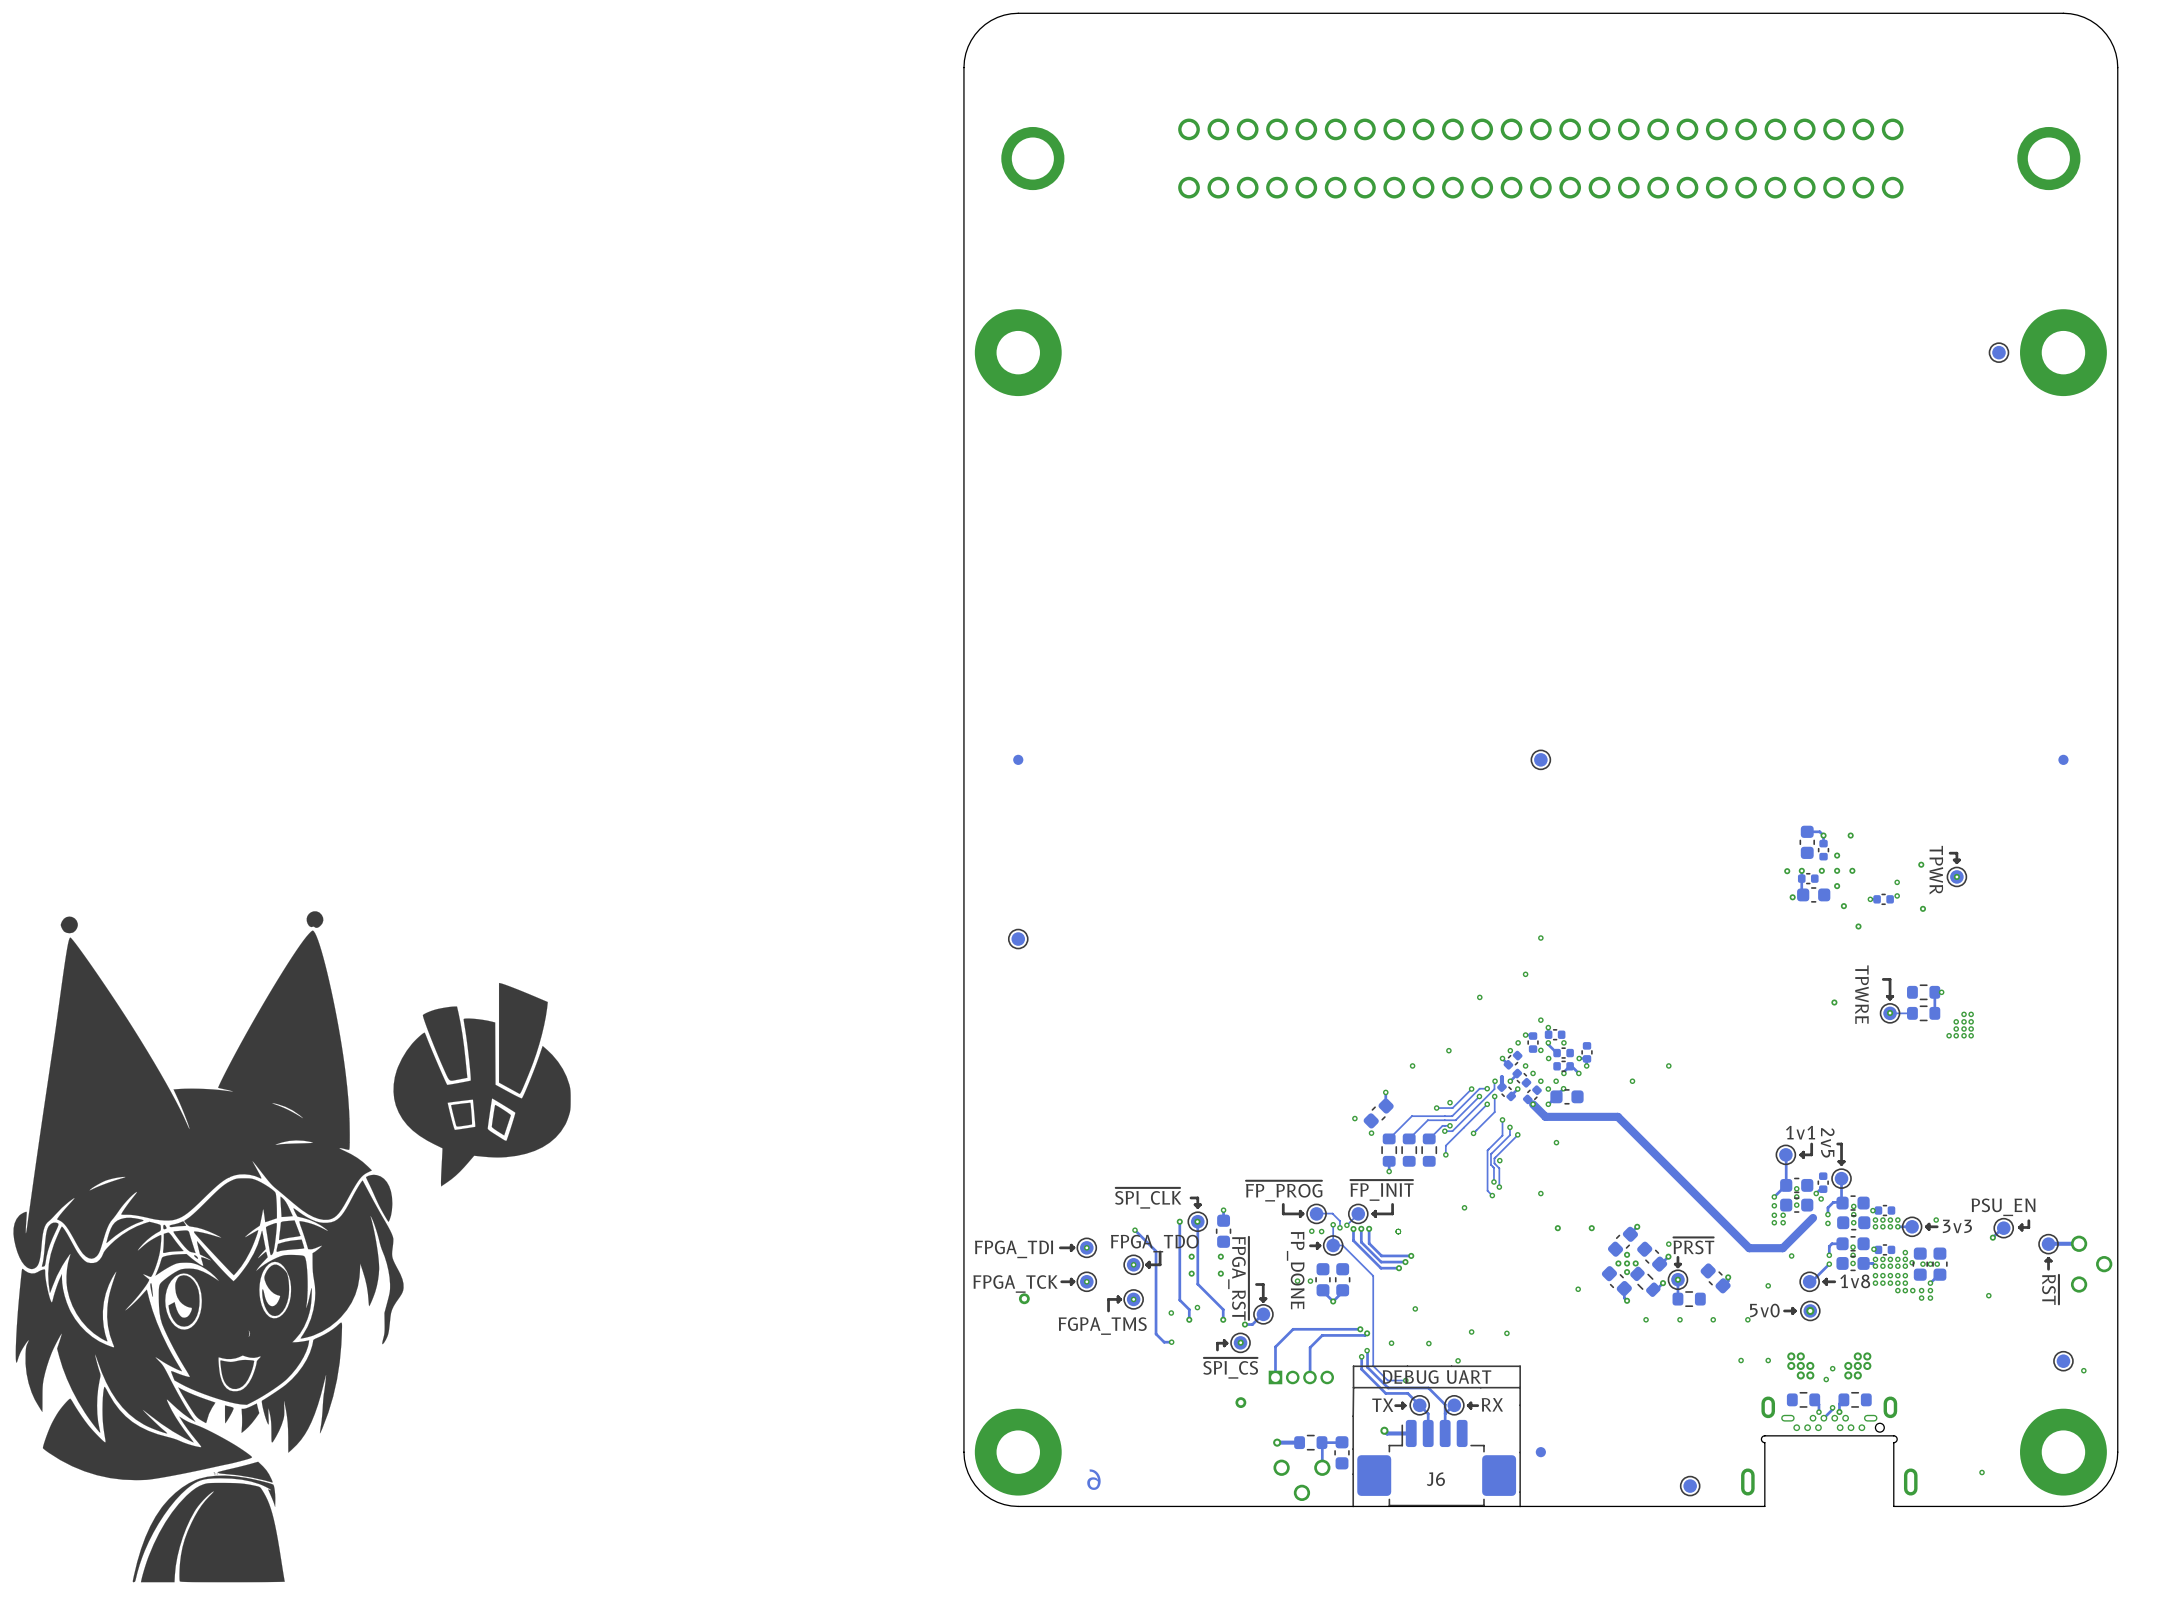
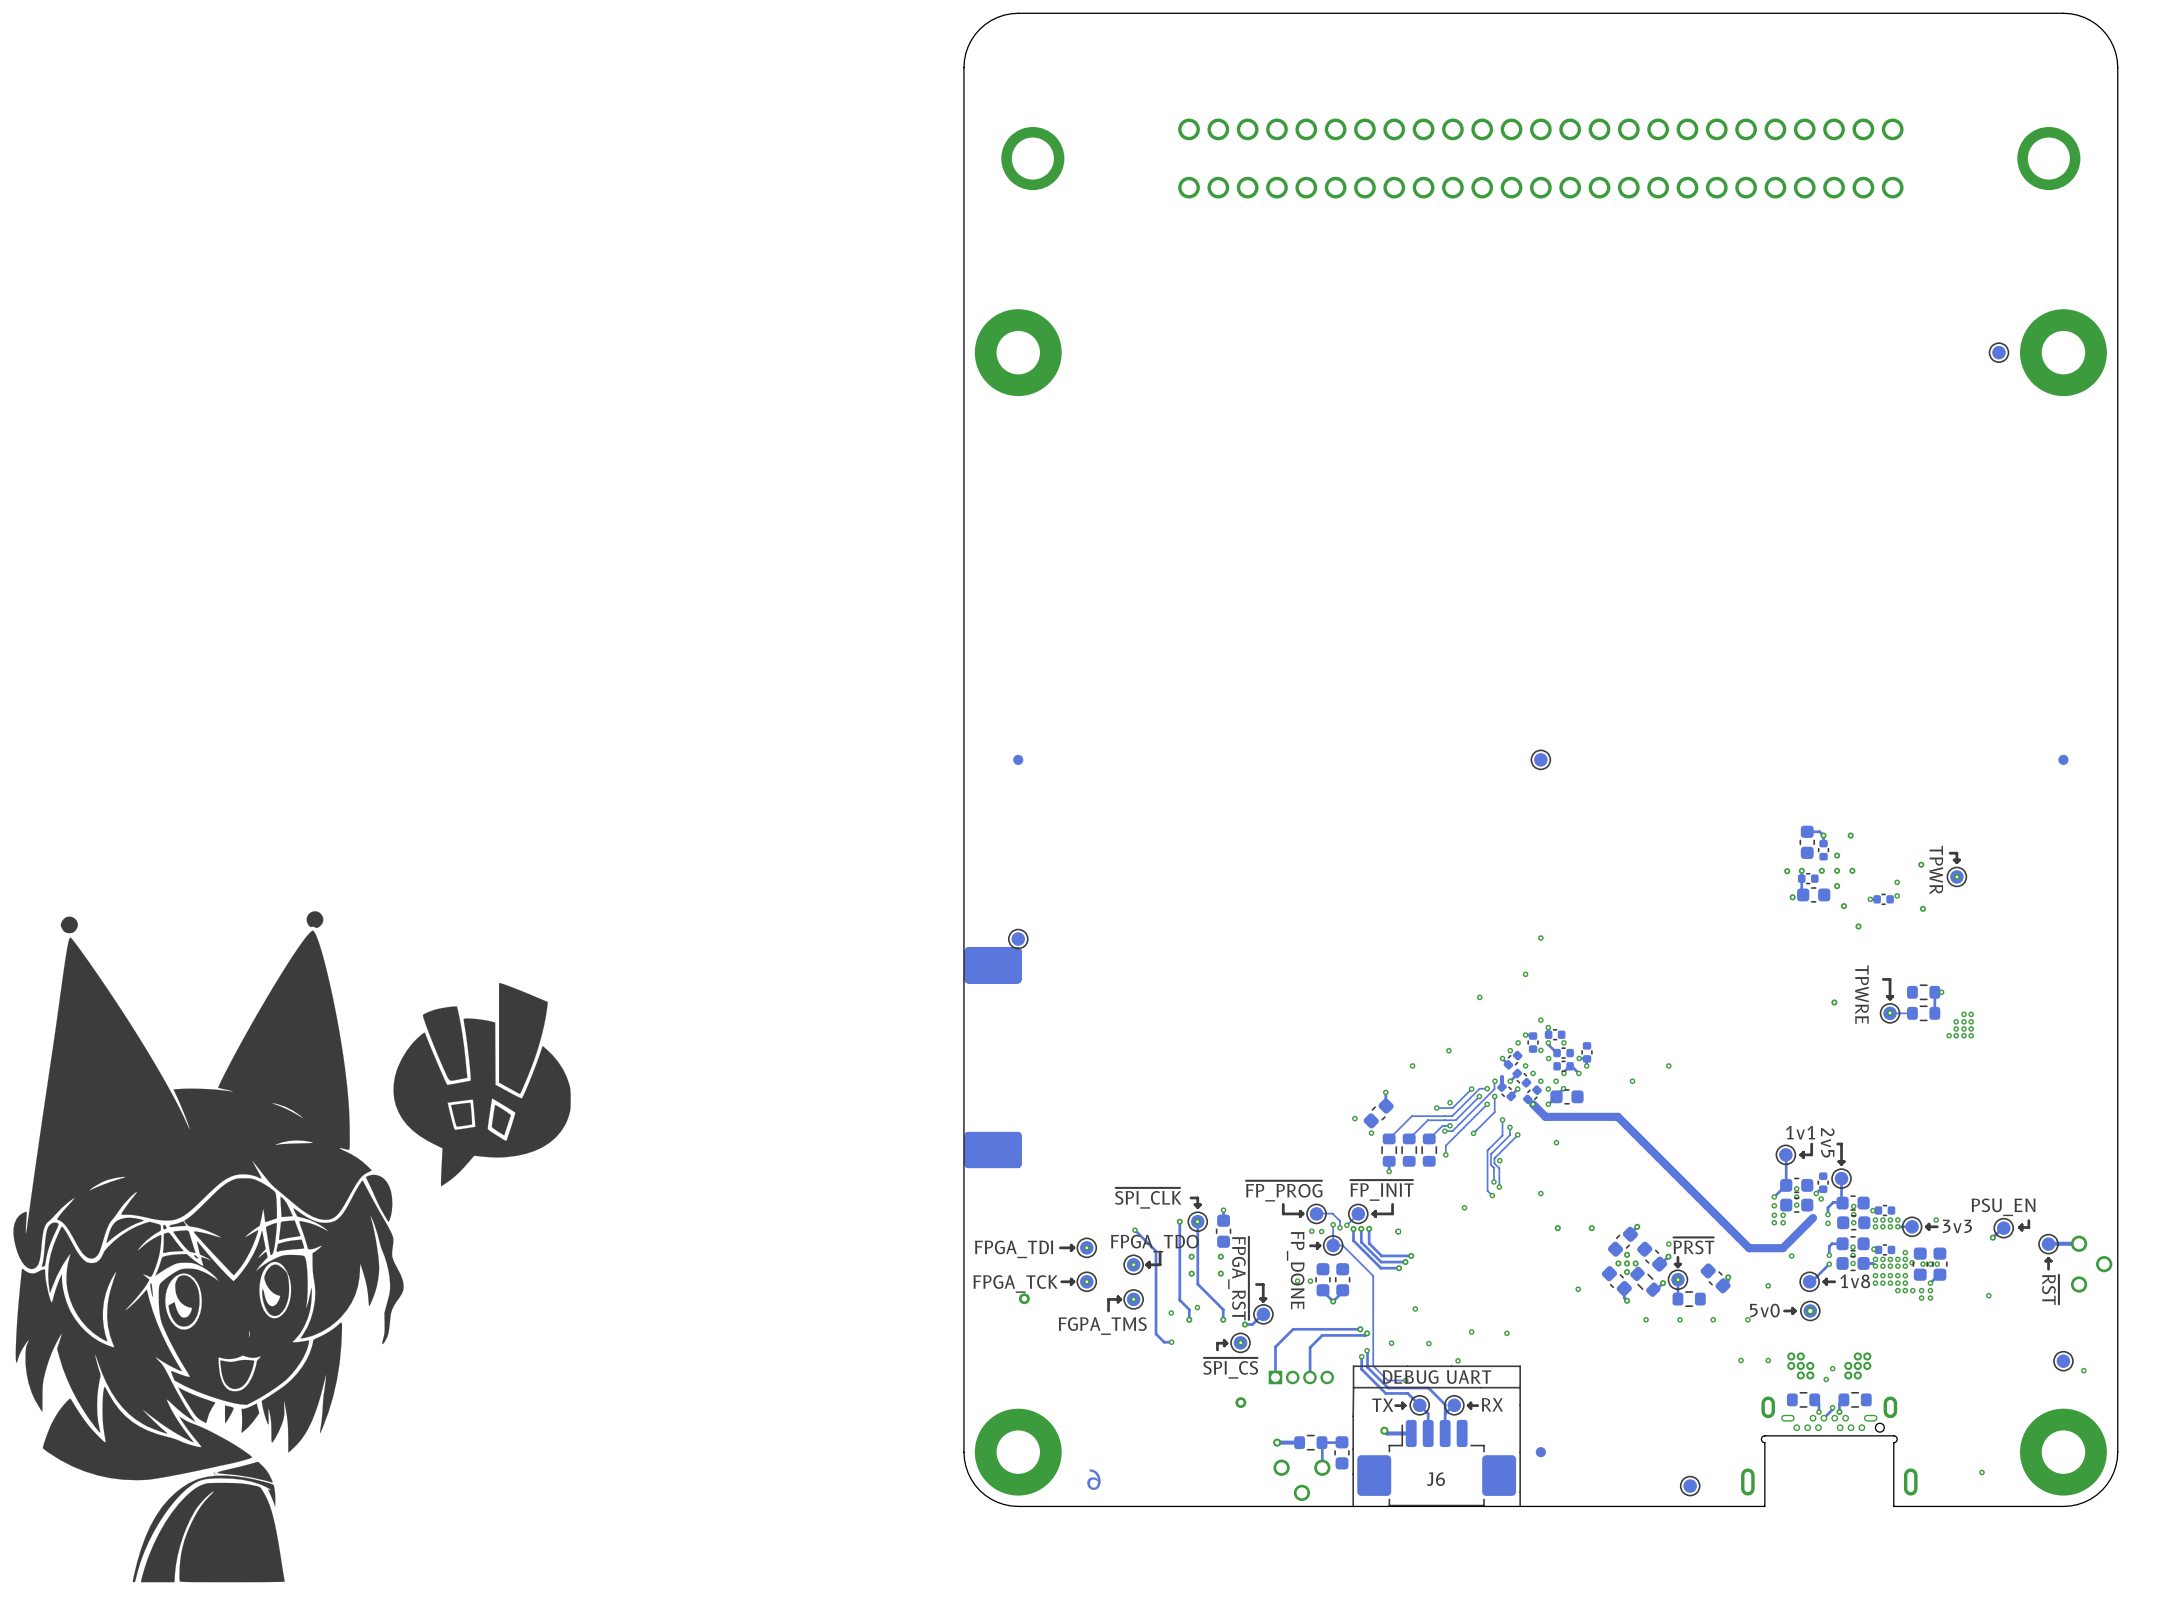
part: none -> (993, 965)
part: none -> (993, 1150)

